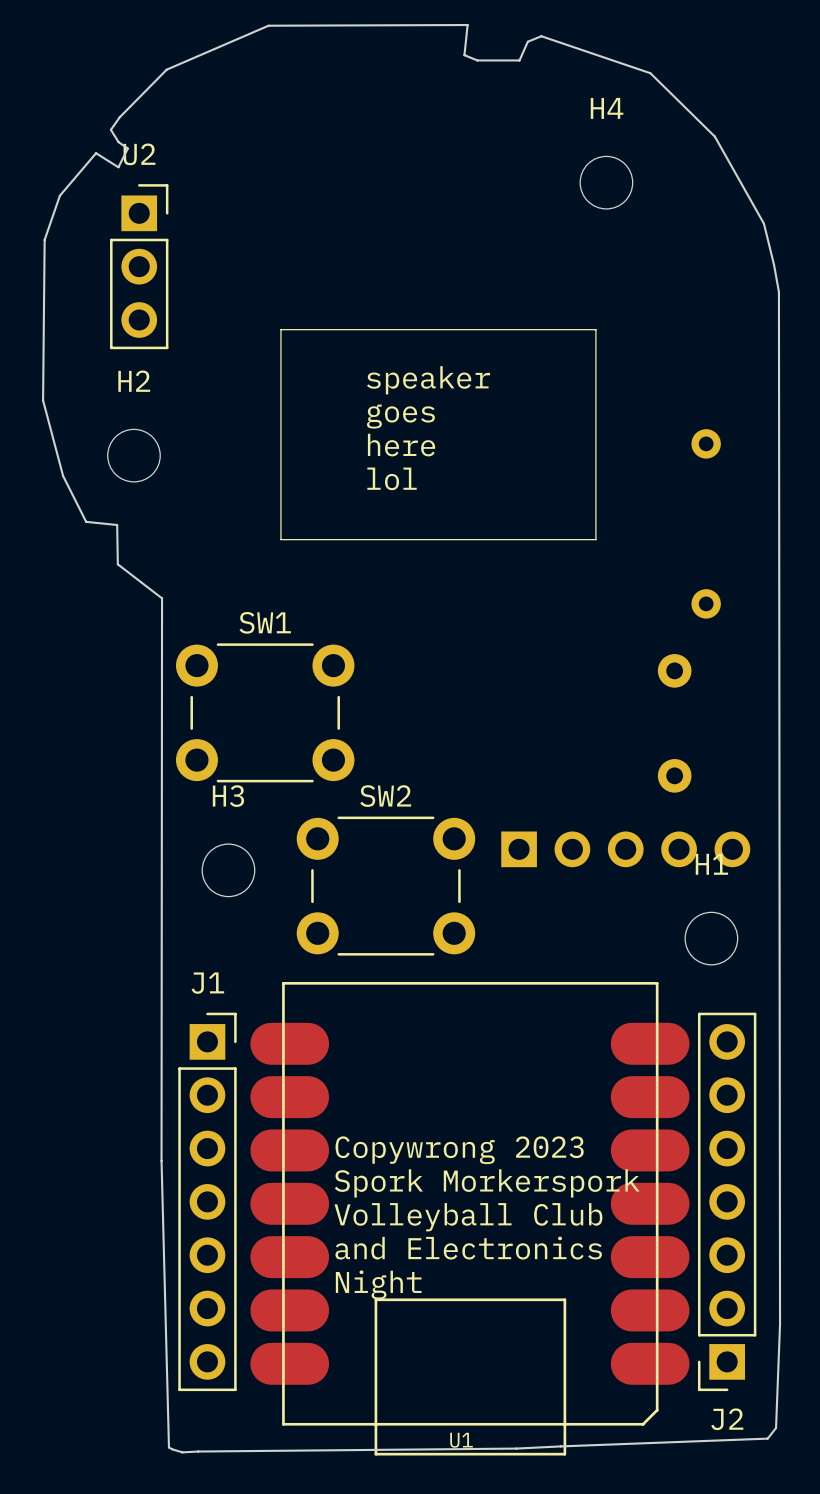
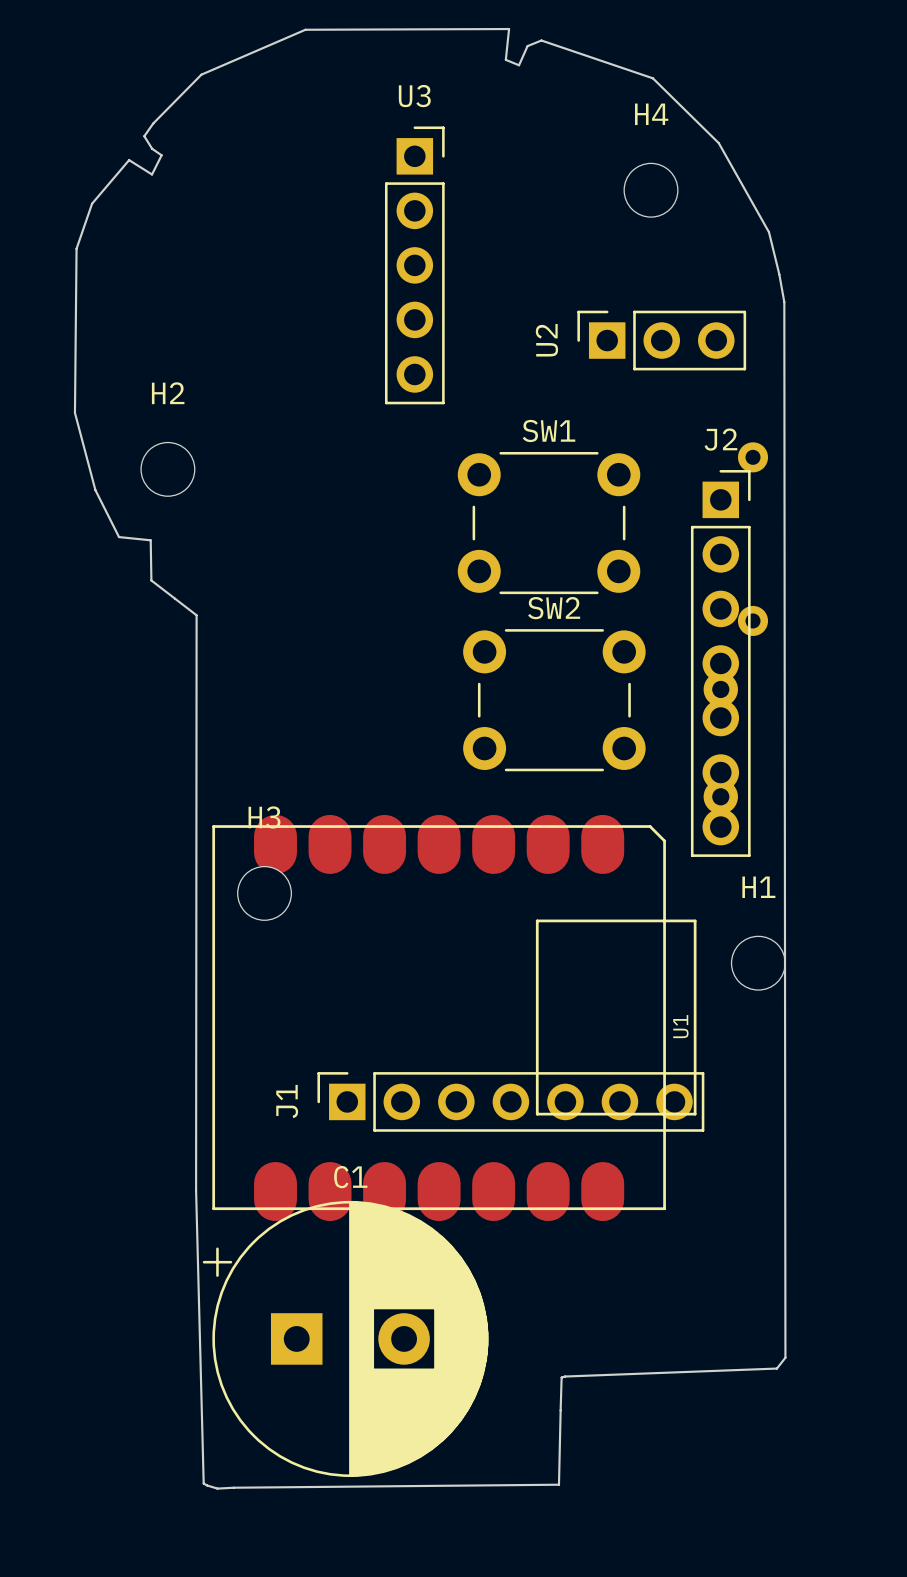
board edge: (477, 60) (519, 60) (527, 41) (541, 36) (650, 73) (714, 136) (763, 223) (778, 292) (780, 1324) (776, 1428) (767, 1438) (516, 1448) -> (519, 65) (527, 46) (541, 40) (652, 78) (718, 143) (769, 232) (784, 302) (785, 1357) (776, 1368) (561, 1377) (558, 1484)
U3: none -> (414, 265)
U2 rotation: 0° (139, 266) -> 90° counterclockwise (661, 340)
U2 position: (139, 266) -> (661, 340)
line: (280, 329) (280, 539) (595, 539) (595, 329) (280, 329) -> none
text: speaker (428, 380) -> none
text: goes (400, 416) -> none
text: here (401, 445) -> none
text: lol (392, 478) -> none
SW1 position: (265, 712) -> (549, 523)
part: (625, 849) -> none
SW2 position: (385, 886) -> (554, 700)
U1 footprint: [250, 981, 690, 1456] -> [212, 814, 697, 1222]
text: Copywrong 2023 (459, 1150) -> none
text: Spork Morkerspork (487, 1183) -> none
J1 rotation: 0° (207, 1201) -> 90° counterclockwise (510, 1101)
J1 position: (207, 1201) -> (510, 1101)
J2 rotation: 0° (727, 1201) -> 180° (720, 663)
J2 position: (727, 1201) -> (720, 663)
text: Volleyball Club (468, 1217) -> none
text: and Electronics (468, 1248) -> none
text: Night (378, 1284) -> none
C1: none -> (345, 1338)
U1 name position: U1 (461, 1440) -> U1 (680, 1026)

